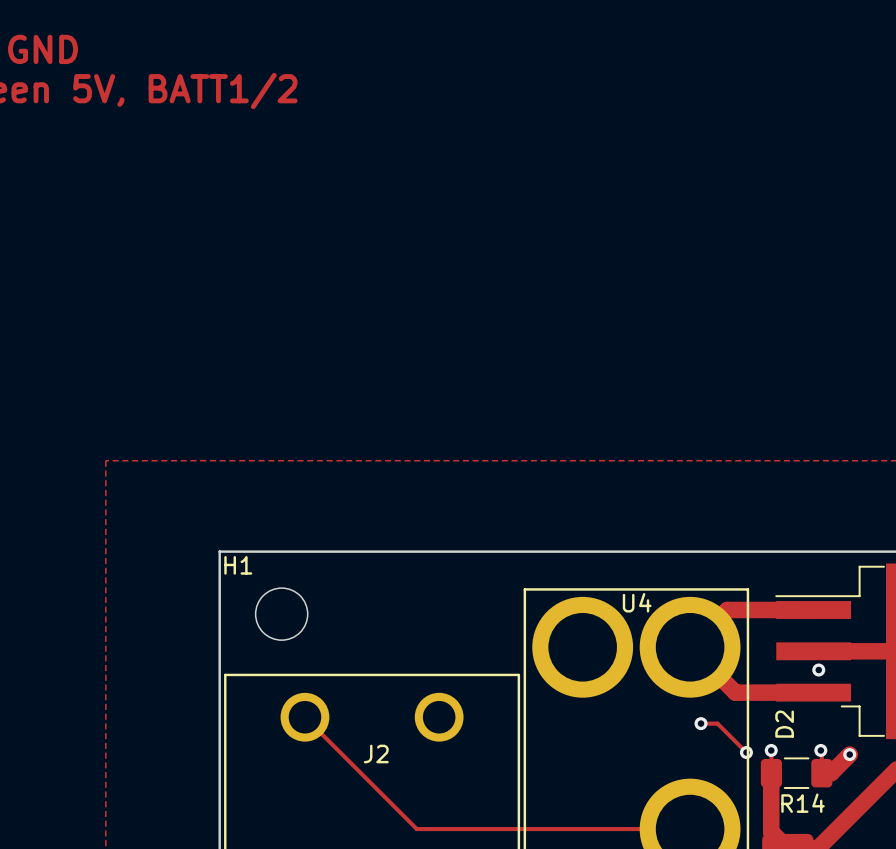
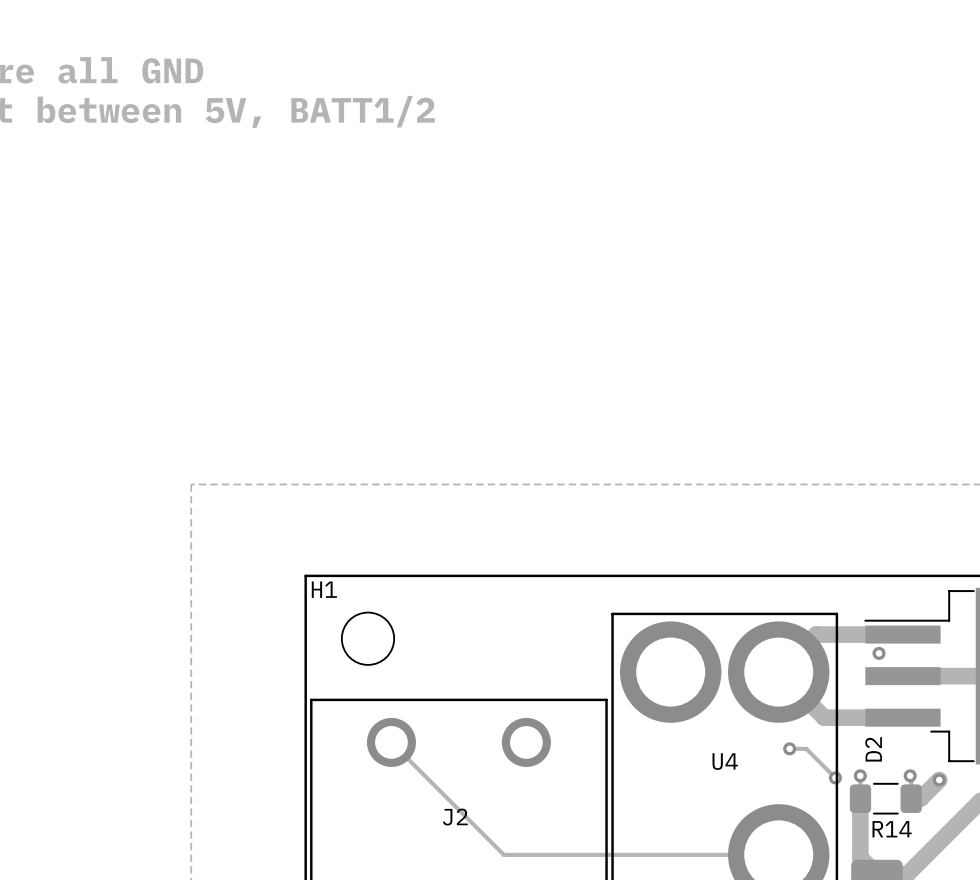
U4 name position: U4 (637, 602) -> U4 (725, 761)
via position: (818, 670) -> (879, 653)
J2 name position: J2 (376, 753) -> J2 (455, 817)

